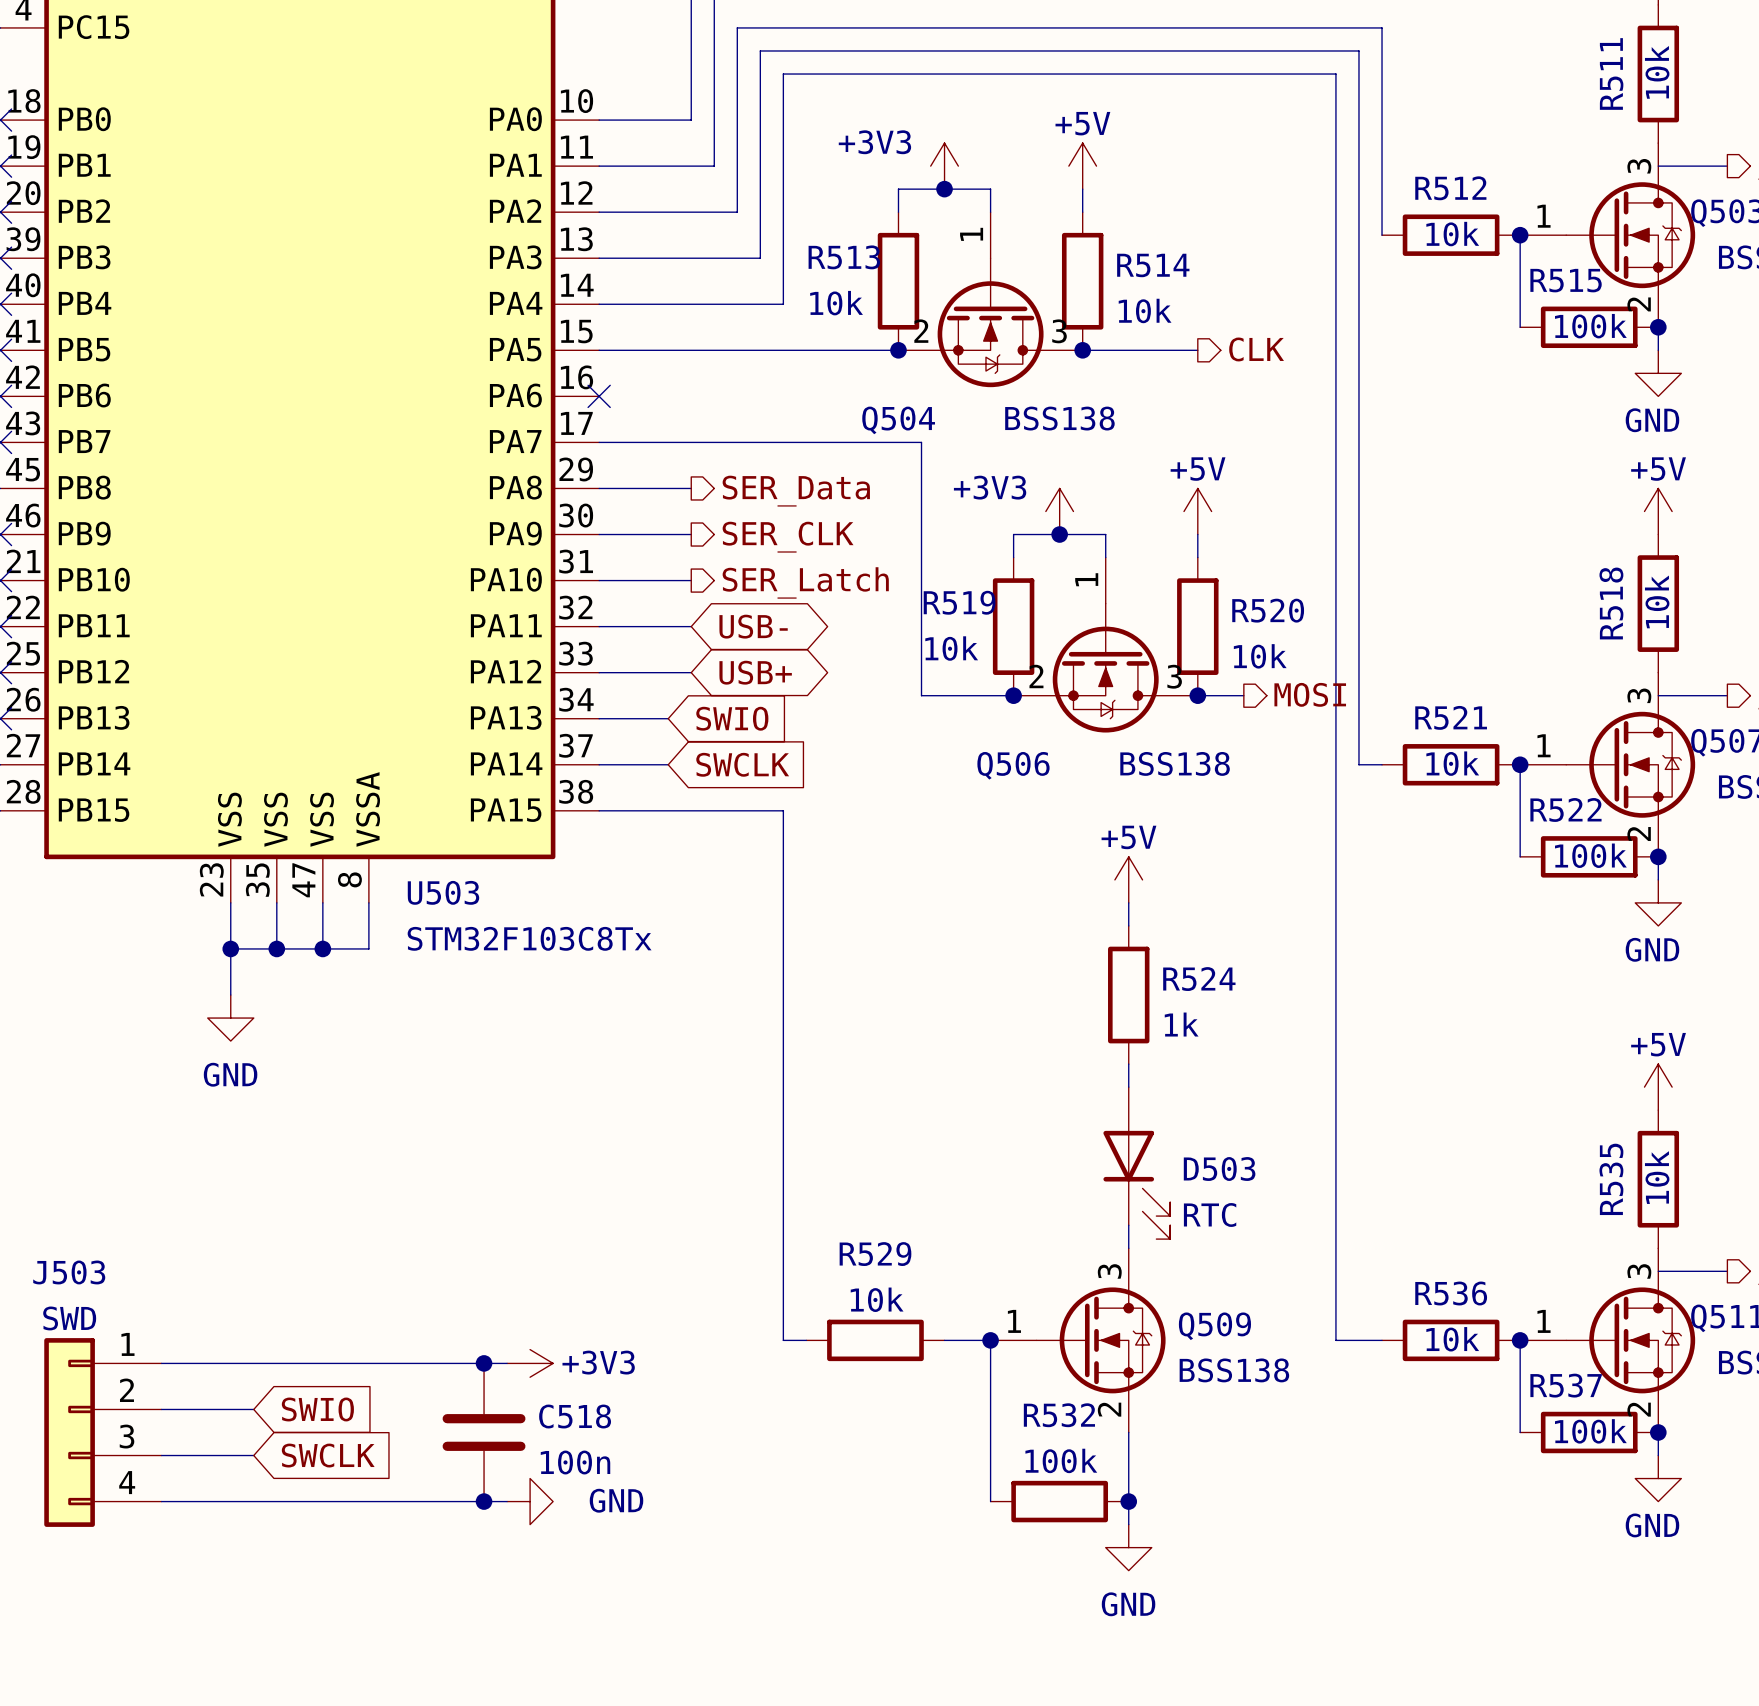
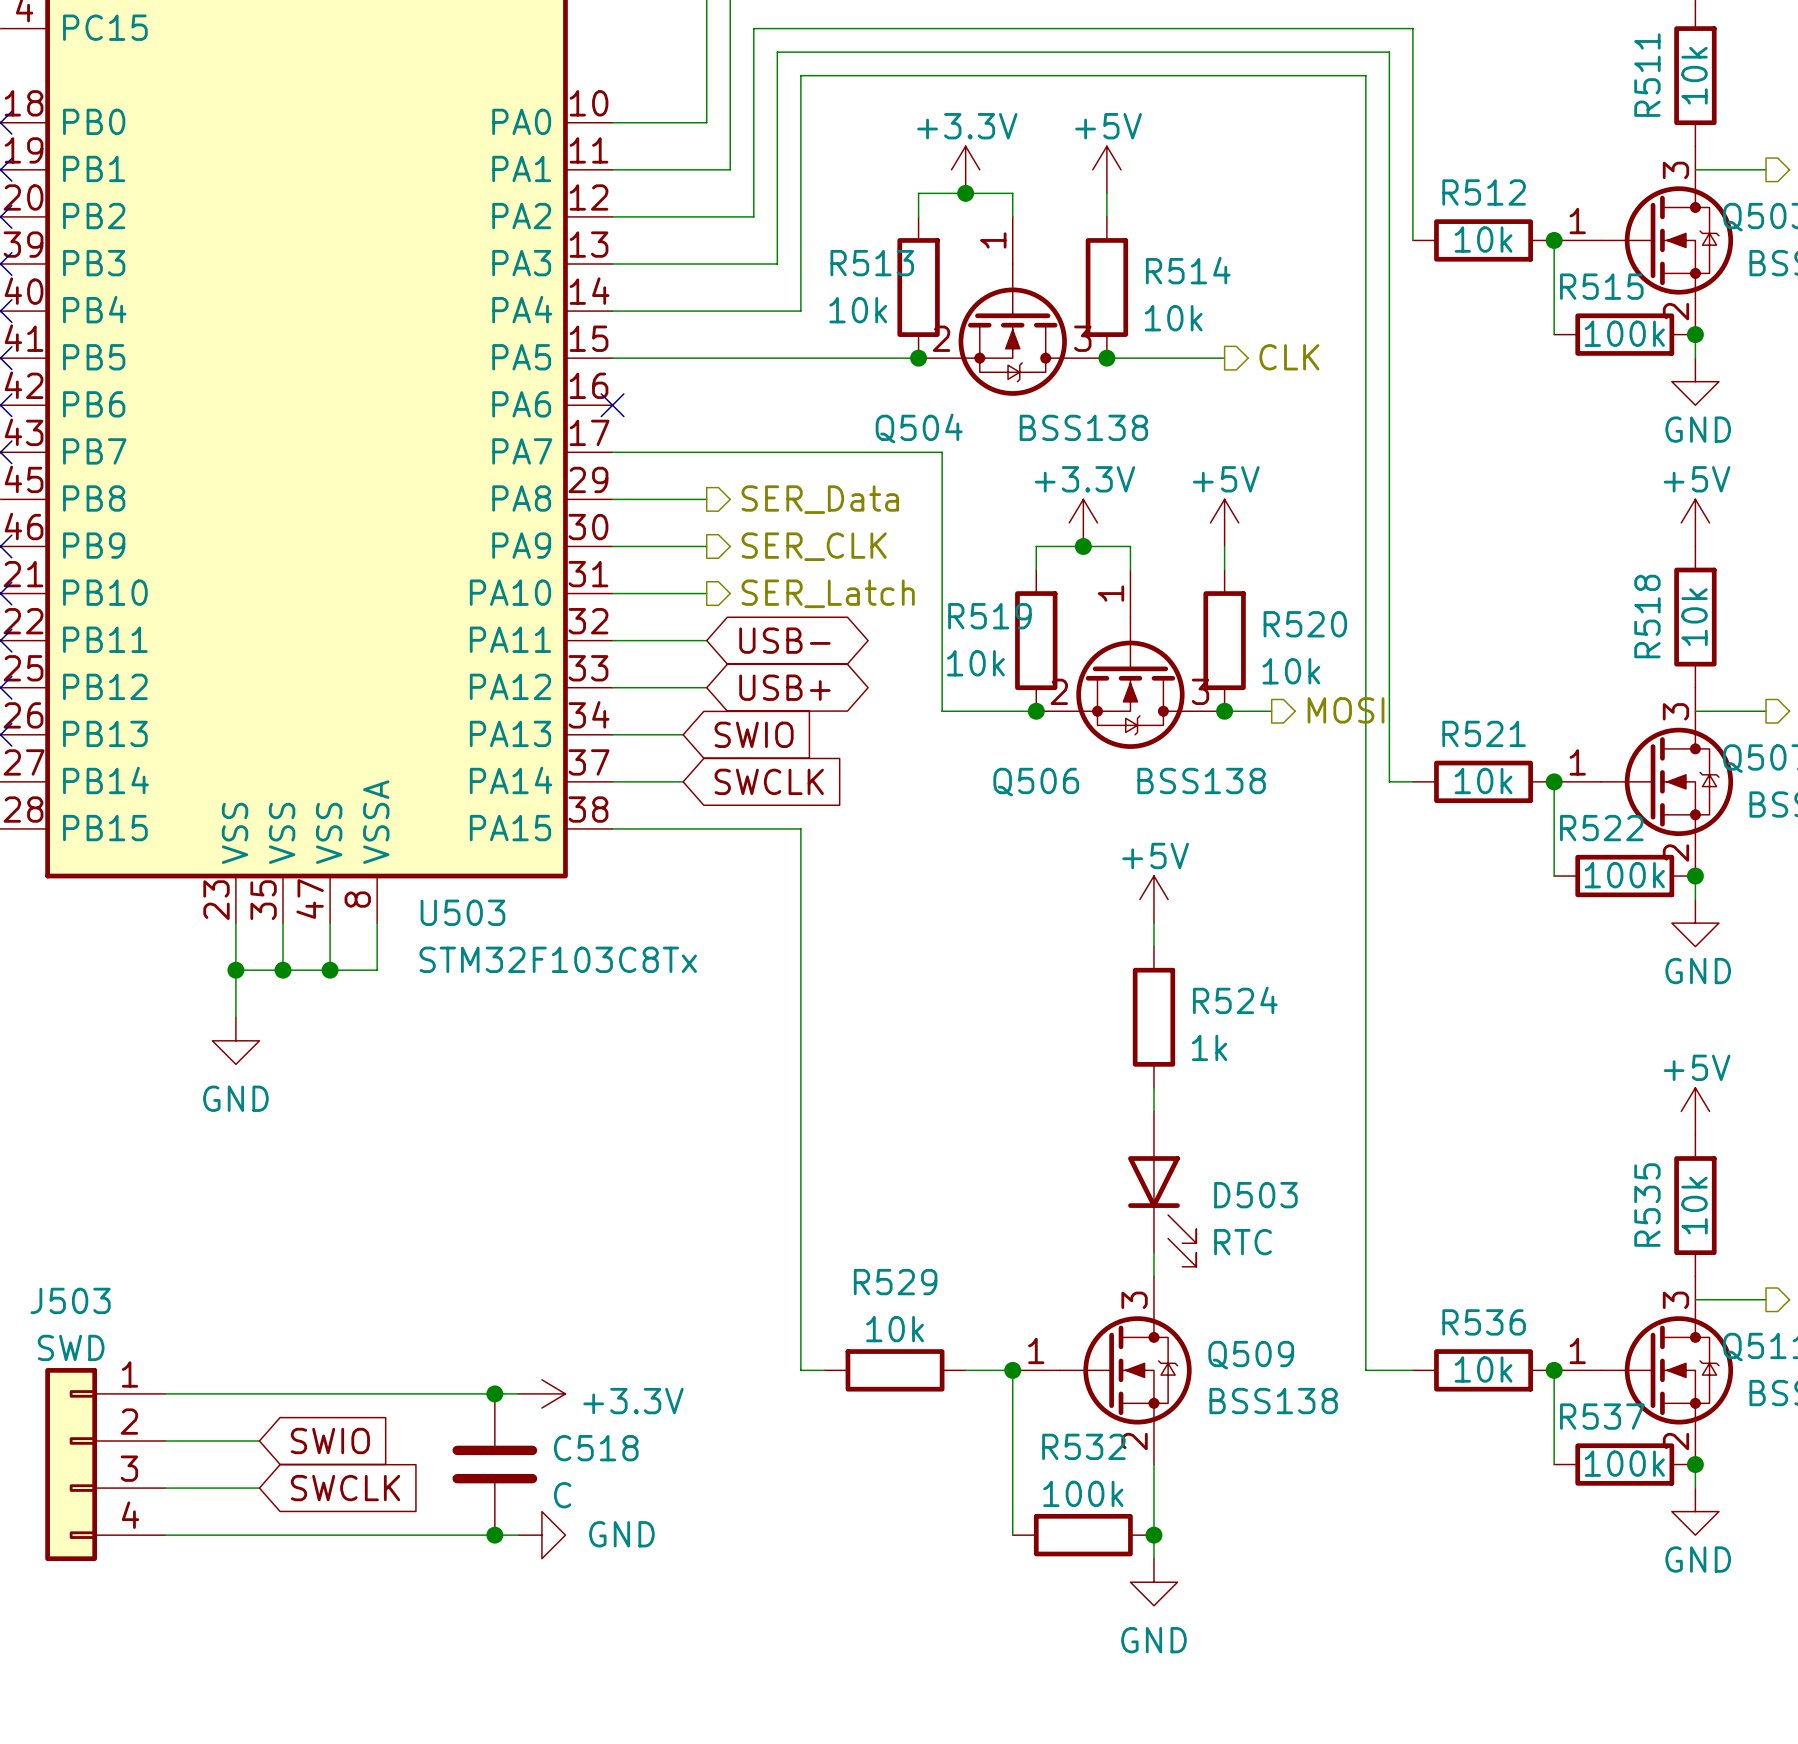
power symbol: +3V3 (944, 166) -> +3.3V (965, 169)
power symbol: +3V3 (1059, 511) -> +3.3V (1083, 522)
power symbol: +3V3 (530, 1363) -> +3.3V (541, 1393)
C518 value: 100n (575, 1462) -> C (562, 1495)

